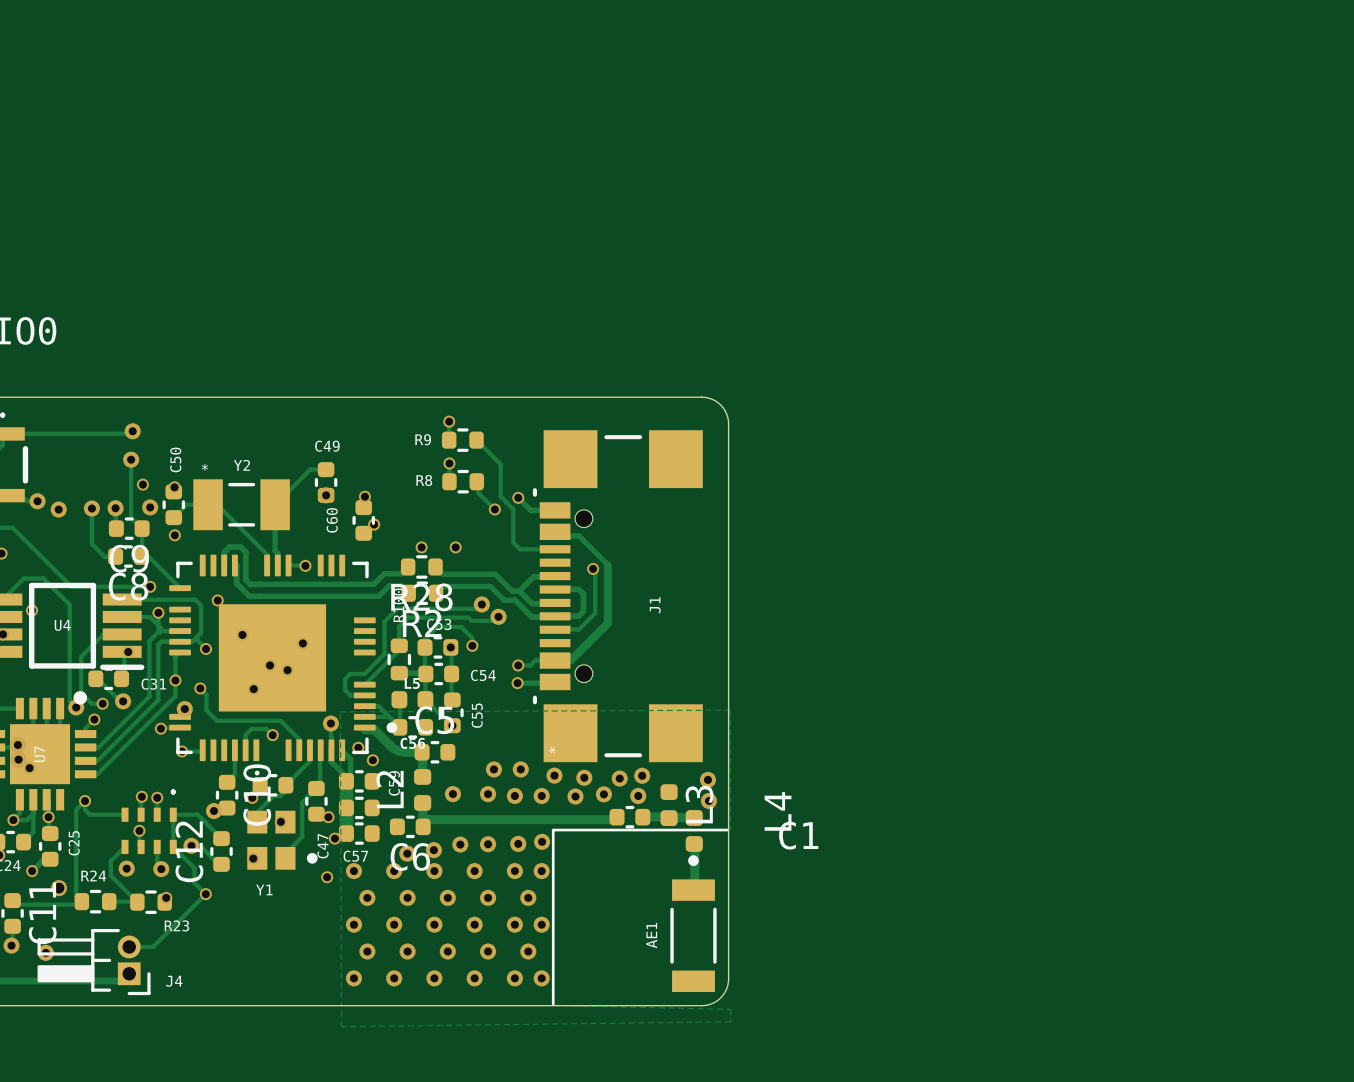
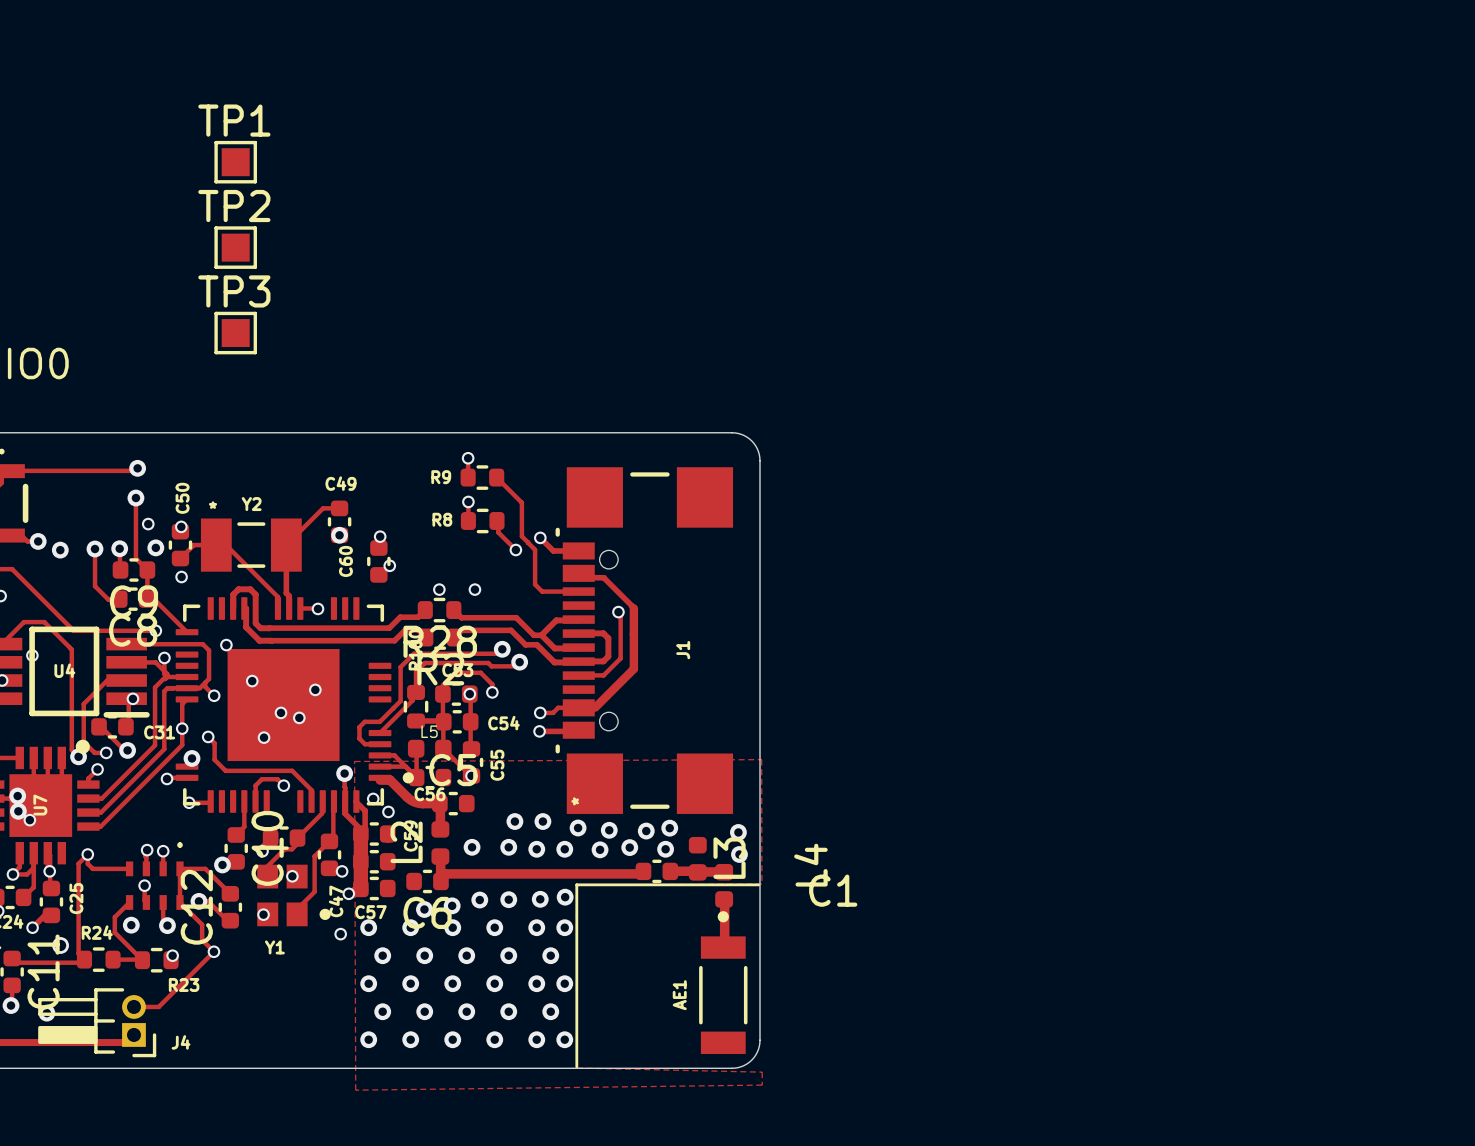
TP1: none -> (235, 162)
TP2: none -> (235, 247)
TP3: none -> (235, 333)

